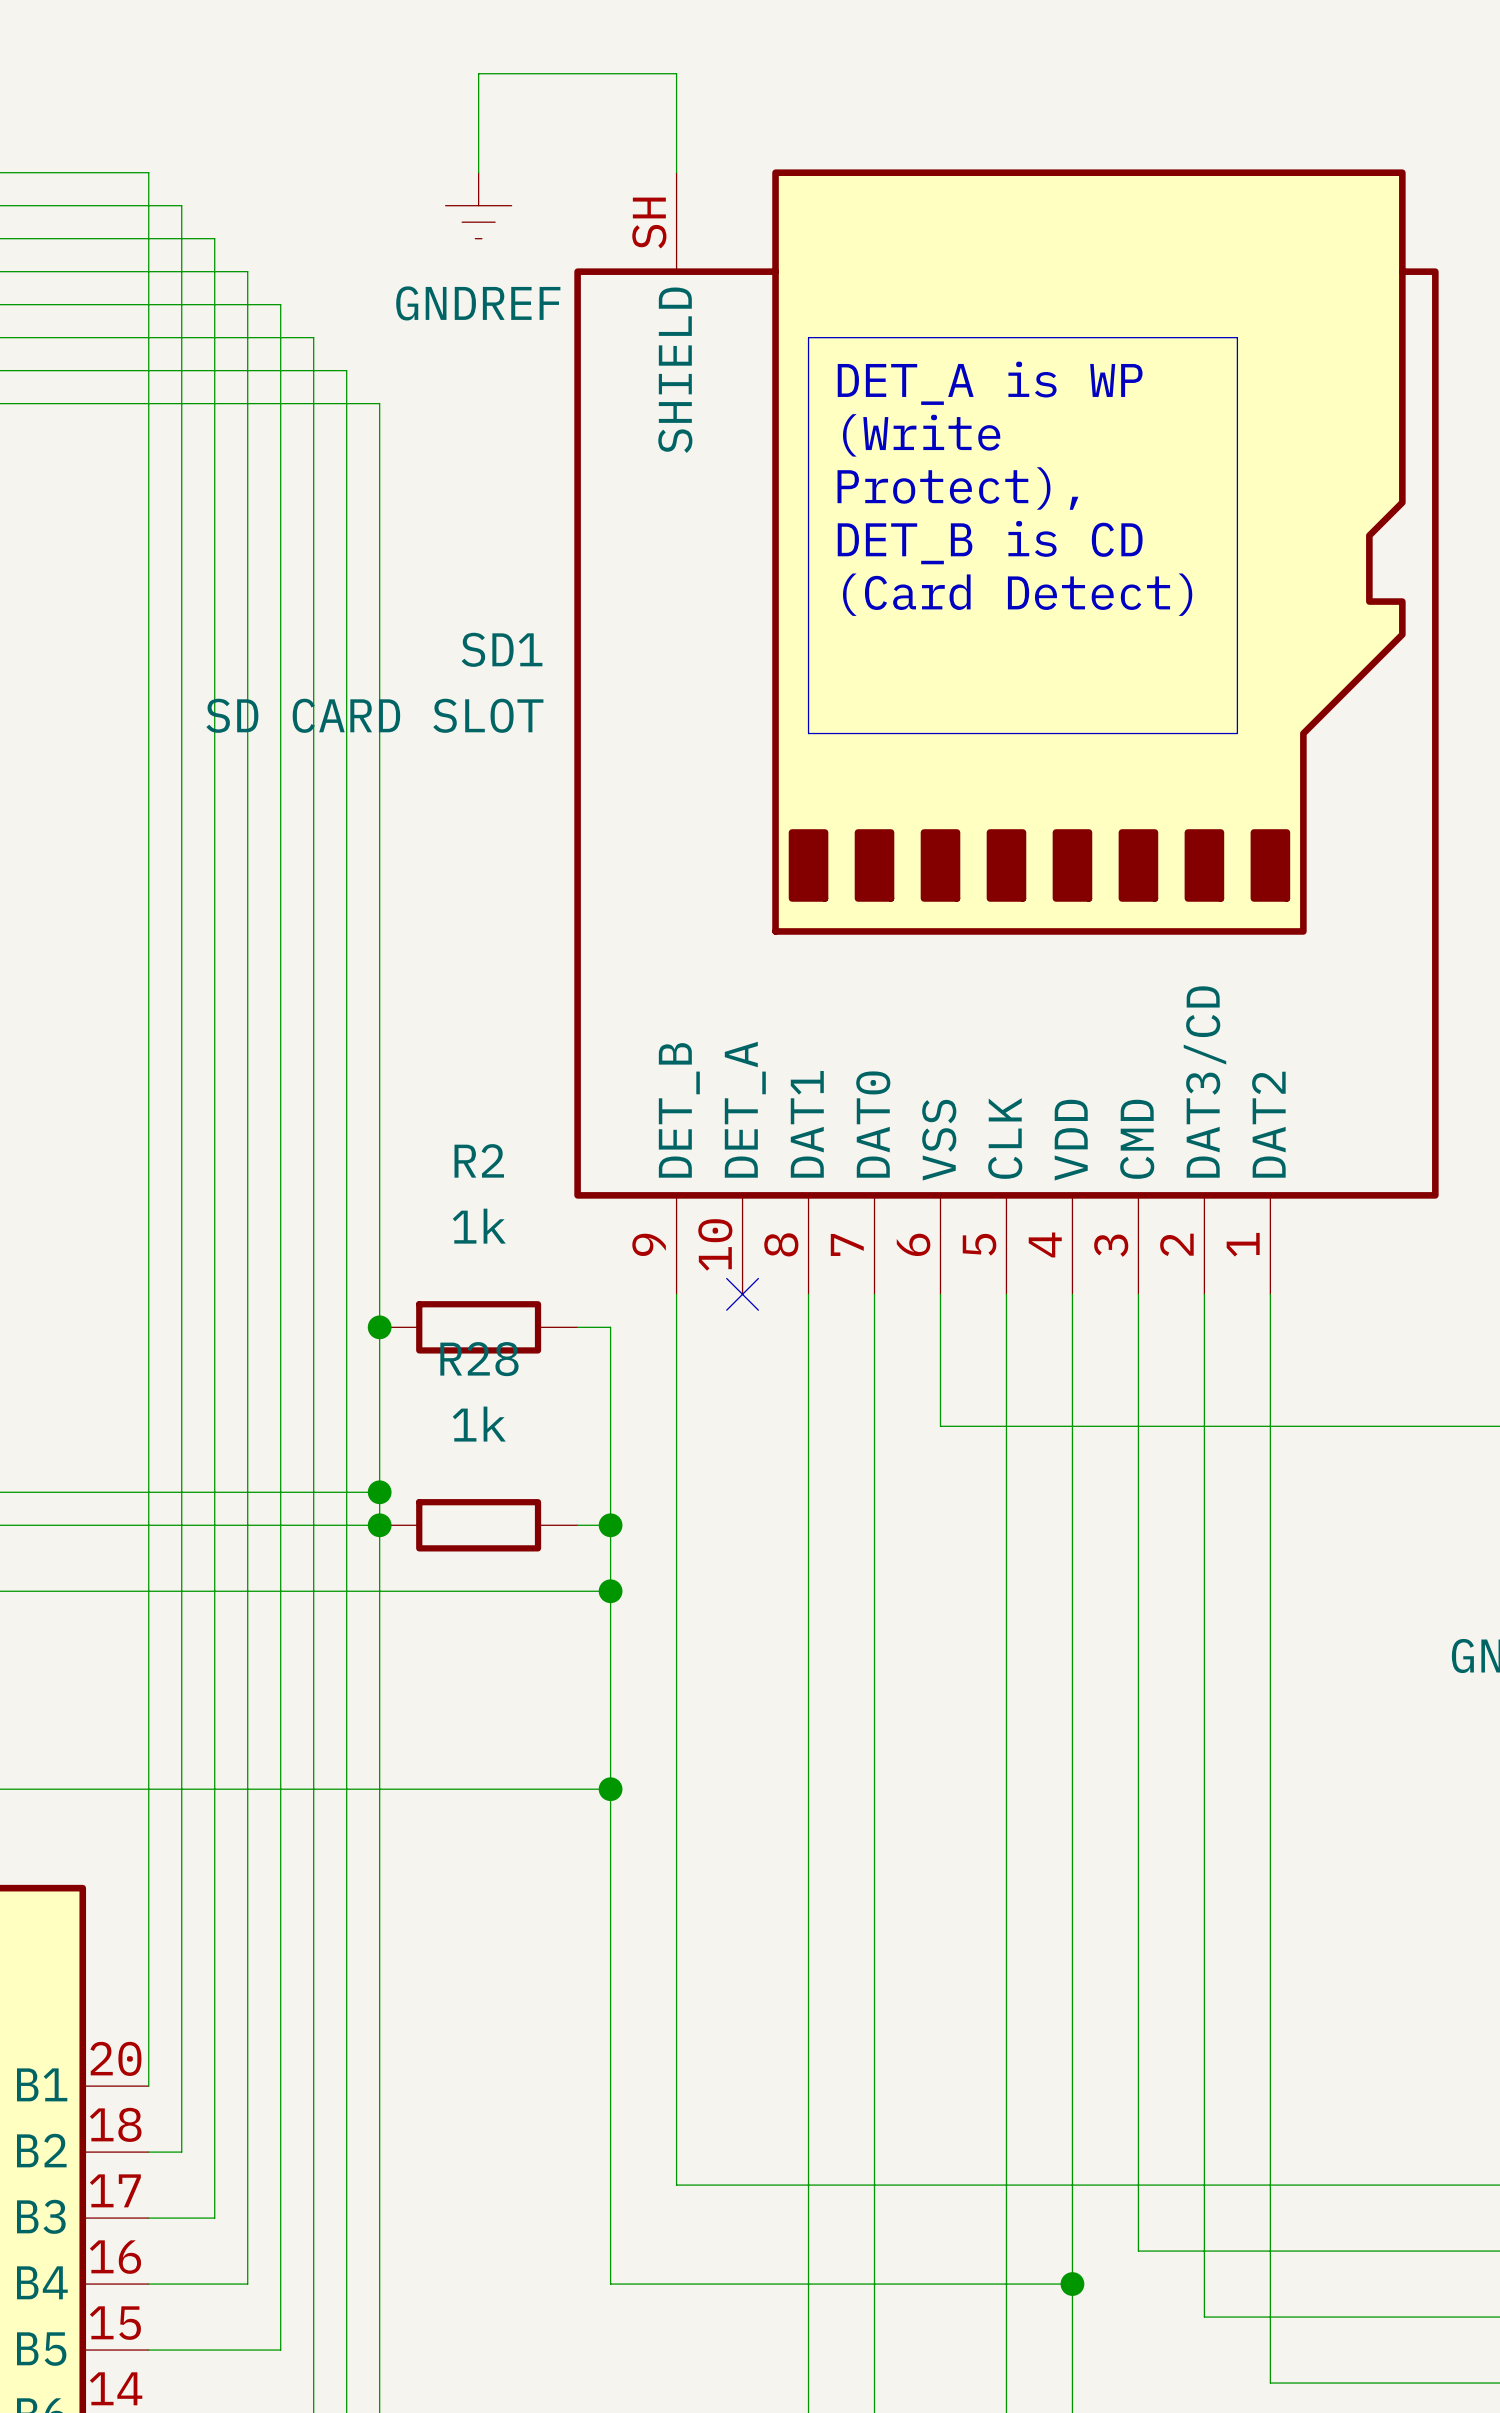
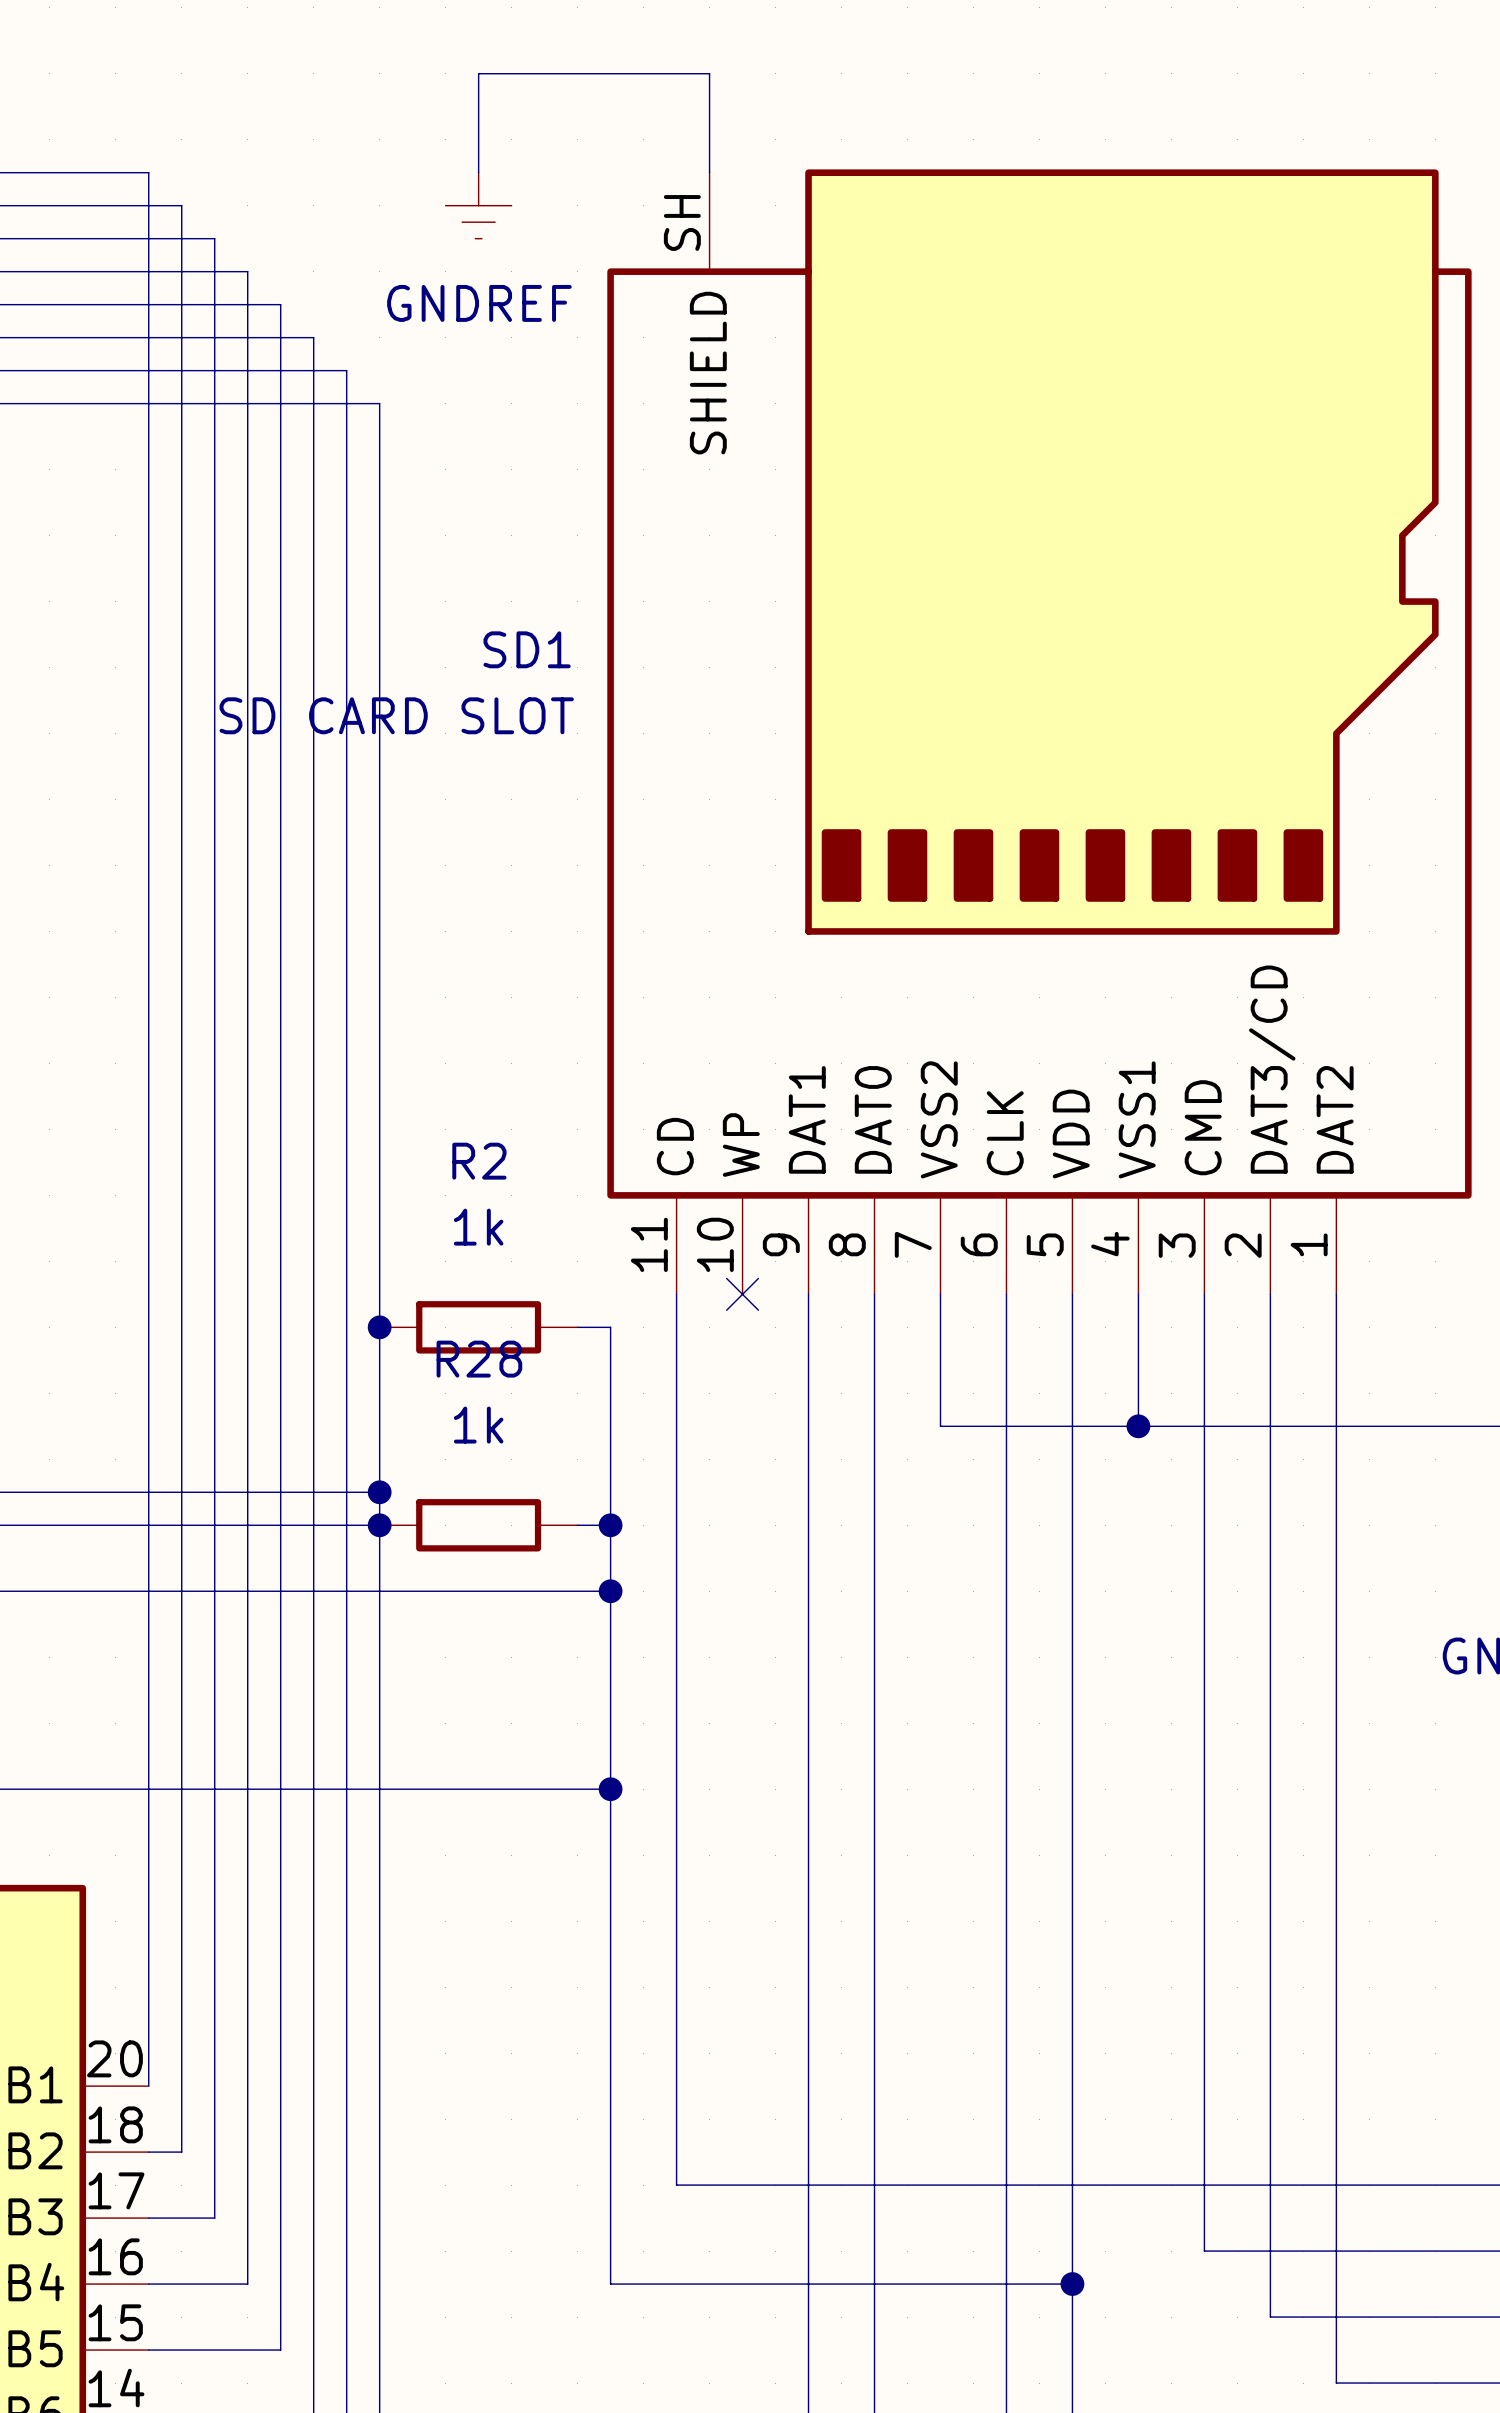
wire: (676, 73) (676, 172) -> (676, 73) (709, 73) (709, 172)
SD1 symbol: [574, 169, 1439, 1295] -> [607, 169, 1472, 1295]
line: (808, 337) (1237, 337) (1237, 733) (808, 733) (808, 337) -> none
text: DET_A is WP (990, 383) -> none
text: (Write (921, 435) -> none
text: Protect), (957, 488) -> none
text: DET_B is CD (990, 542) -> none
text: (Card Detect) (1017, 594) -> none
wire: (1138, 1426) (1138, 2251) (1204, 2251) (1204, 2317) (1270, 2317) (1270, 2383) (1336, 2383) -> (1336, 1294) (1336, 2383)
junction: none -> (1138, 1426)

